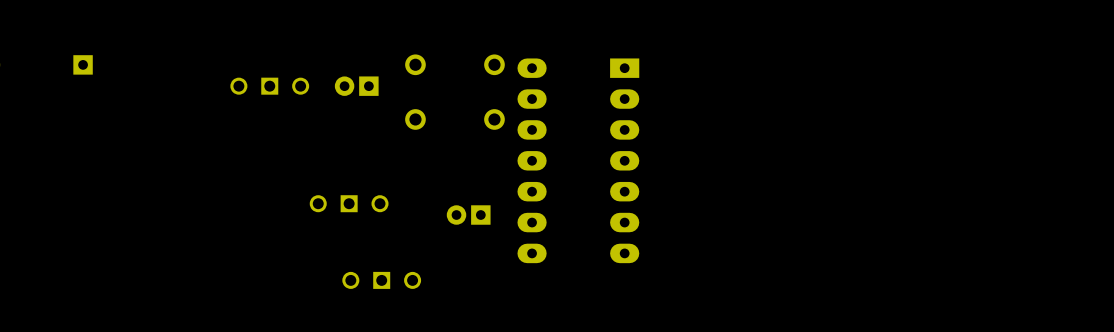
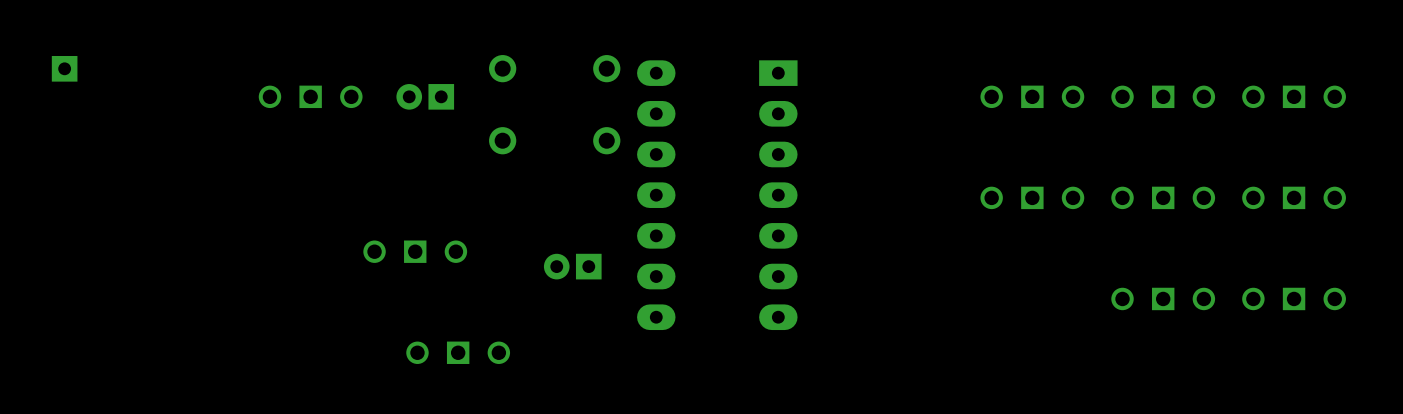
part: none -> (1032, 96)
part: none -> (1163, 96)
part: none -> (1294, 96)
part: none -> (1032, 197)
part: none -> (1163, 197)
part: none -> (1294, 197)
part: none -> (1163, 298)
part: none -> (1294, 298)

